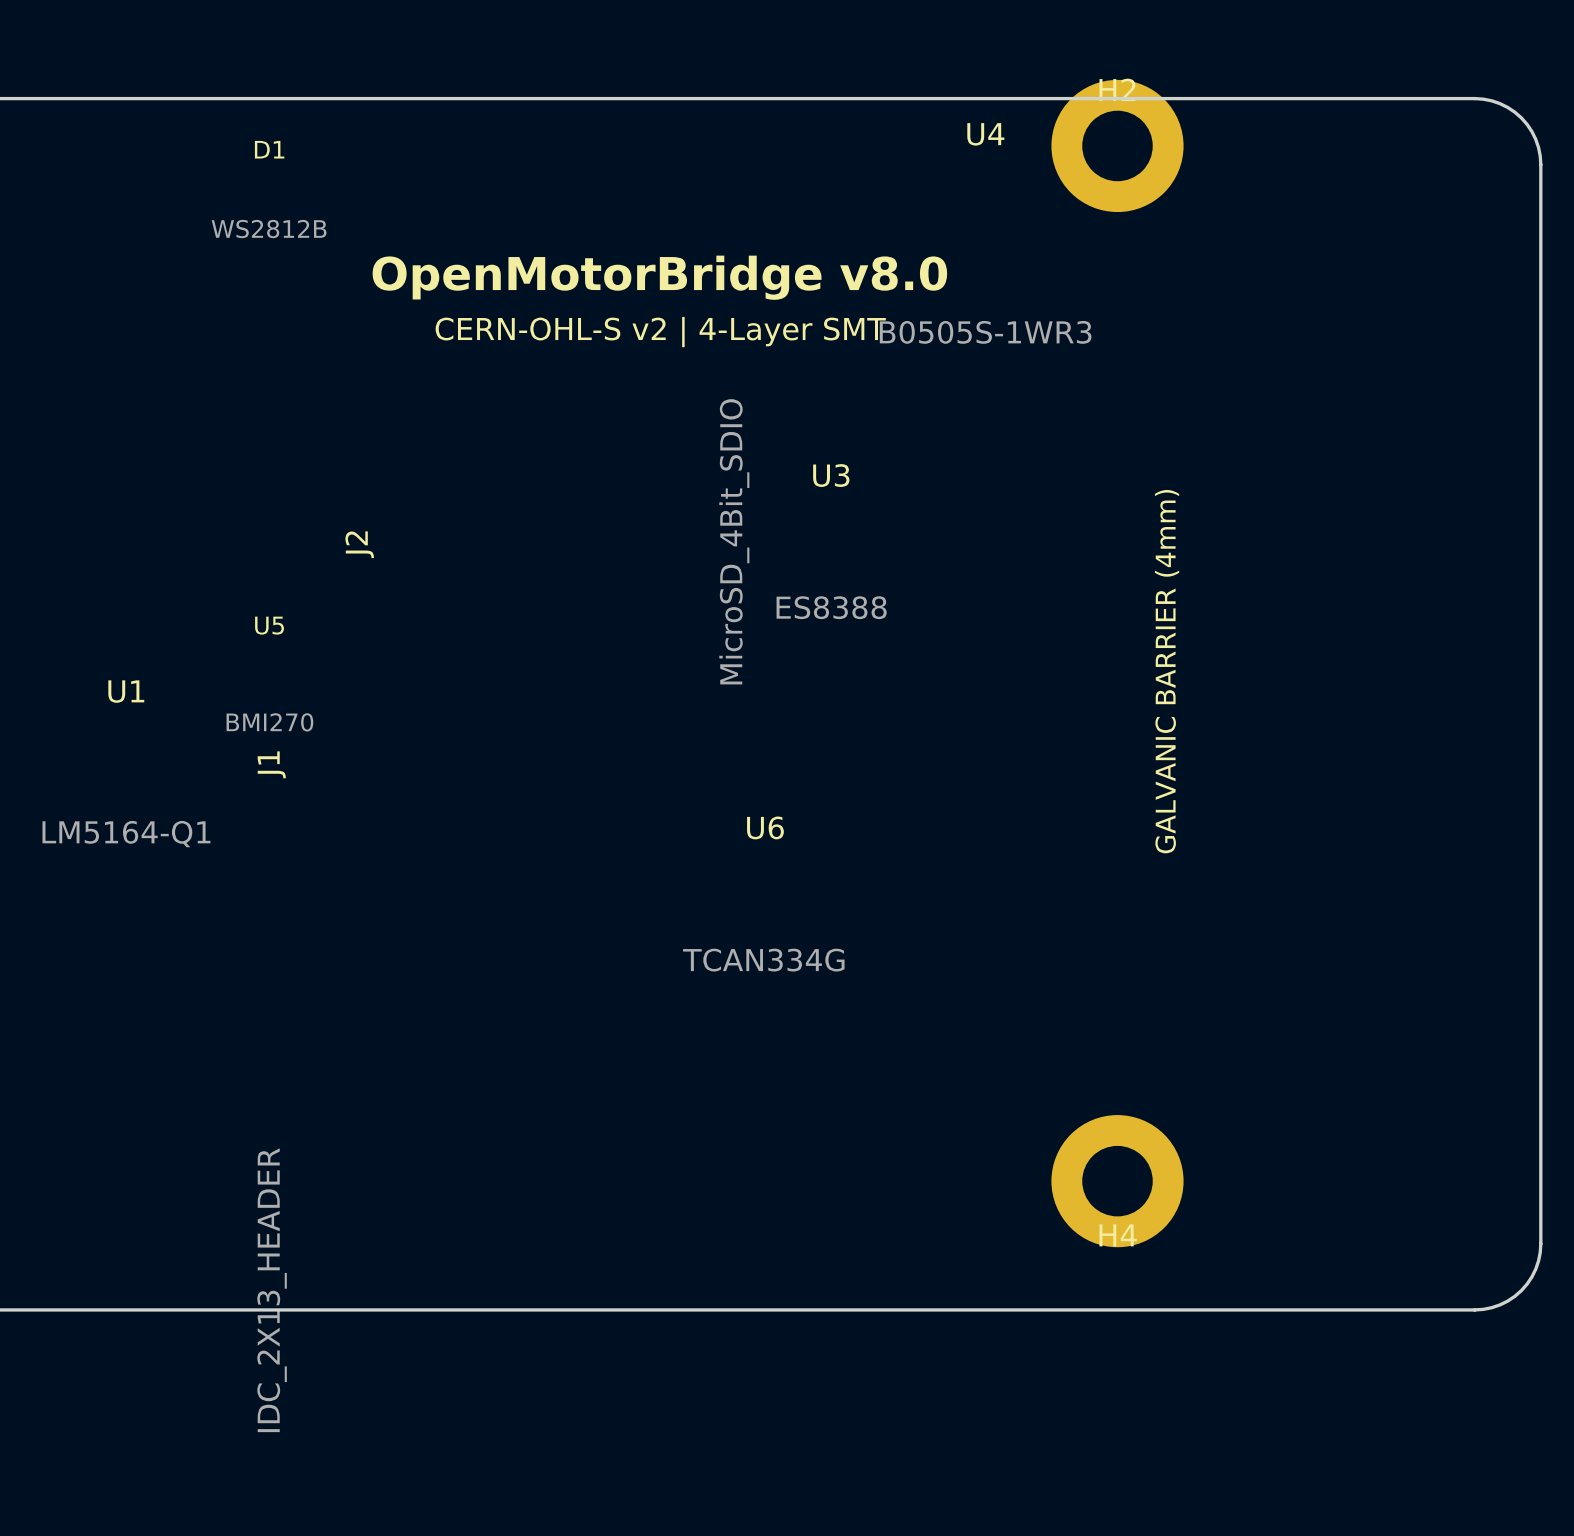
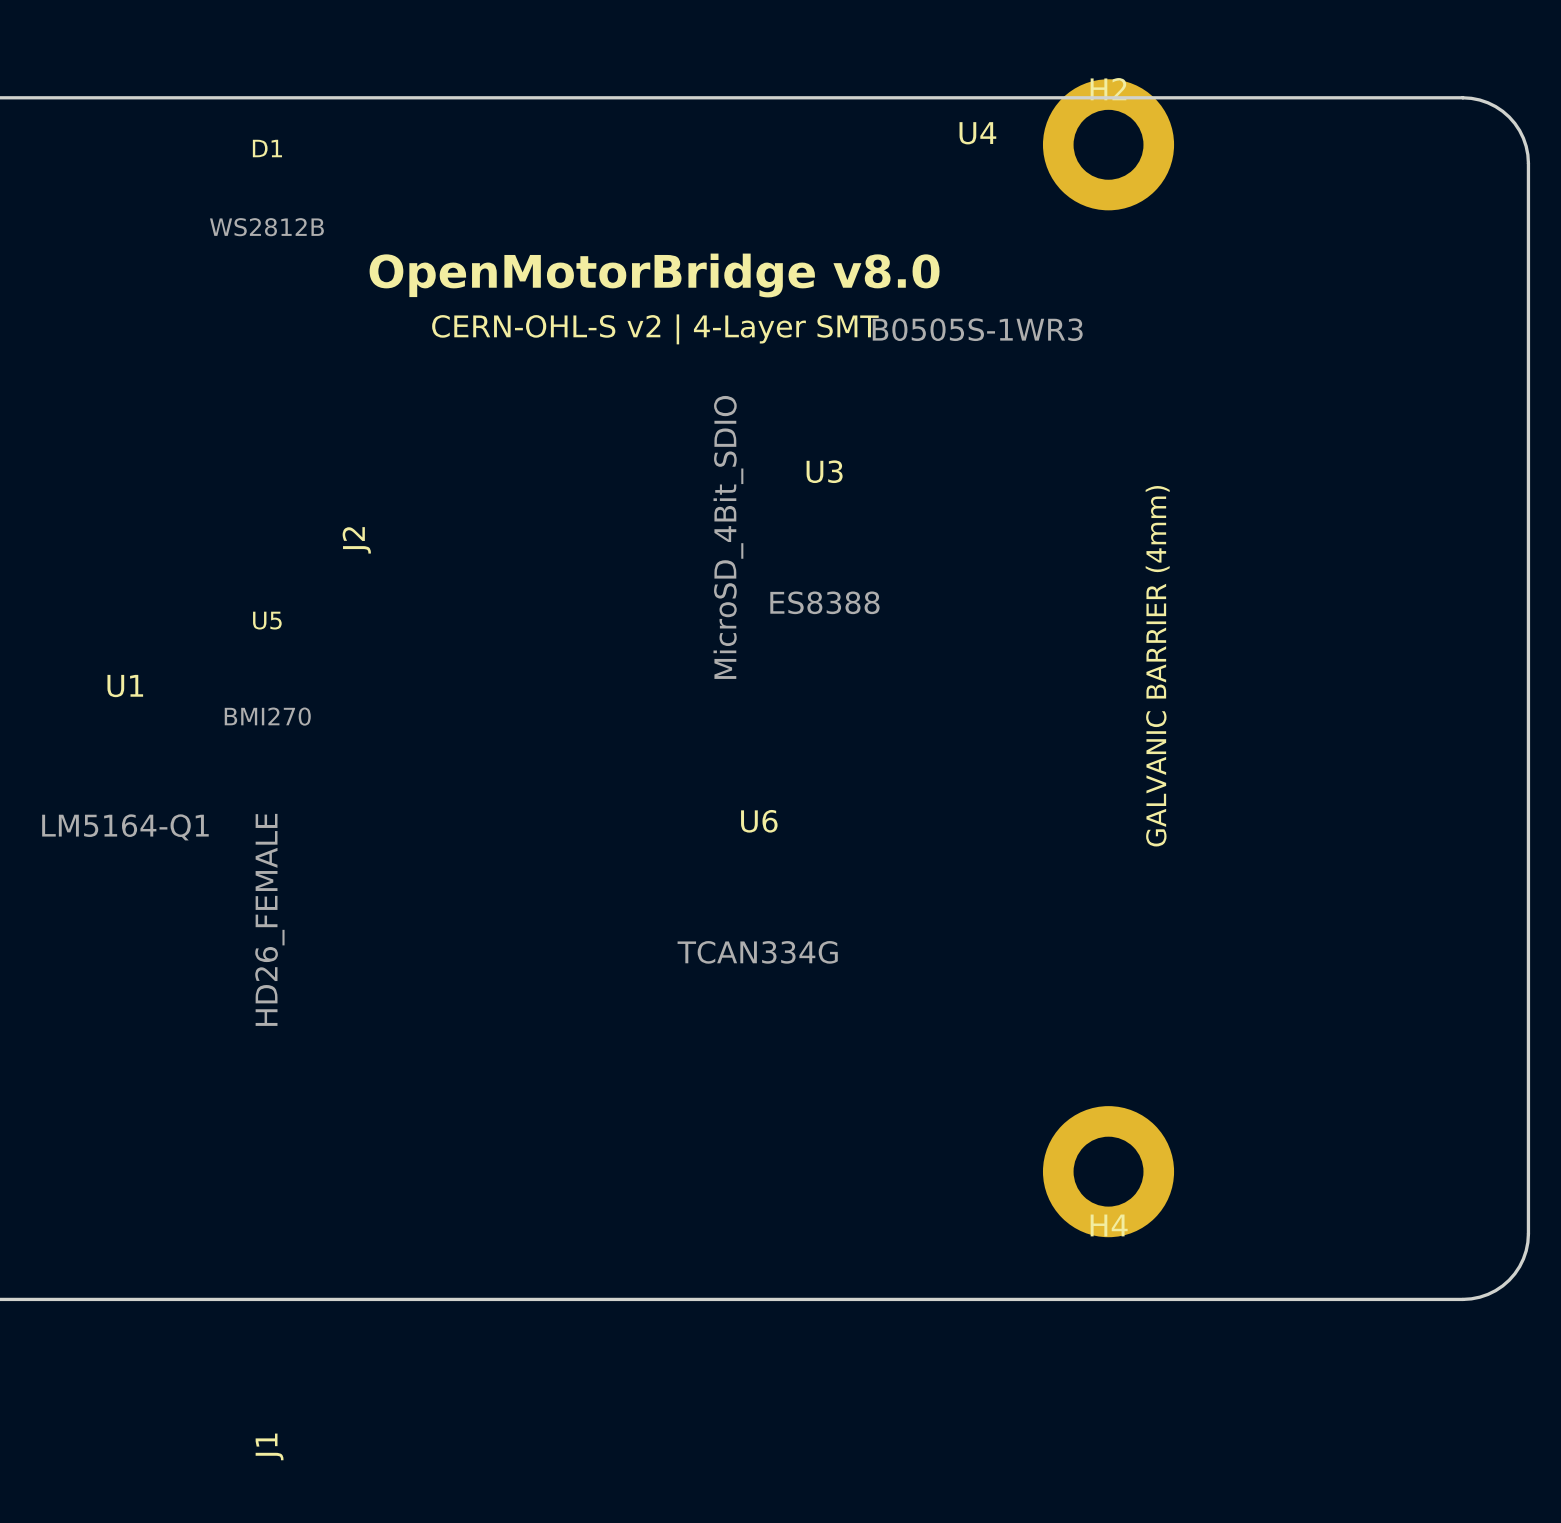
J1 name position: J1 (271, 764) -> J1 (269, 1446)
J1 position: (272, 1091) -> (269, 1137)
J1 value: IDC_2X13_HEADER (272, 1290) -> HD26_FEMALE (269, 919)

